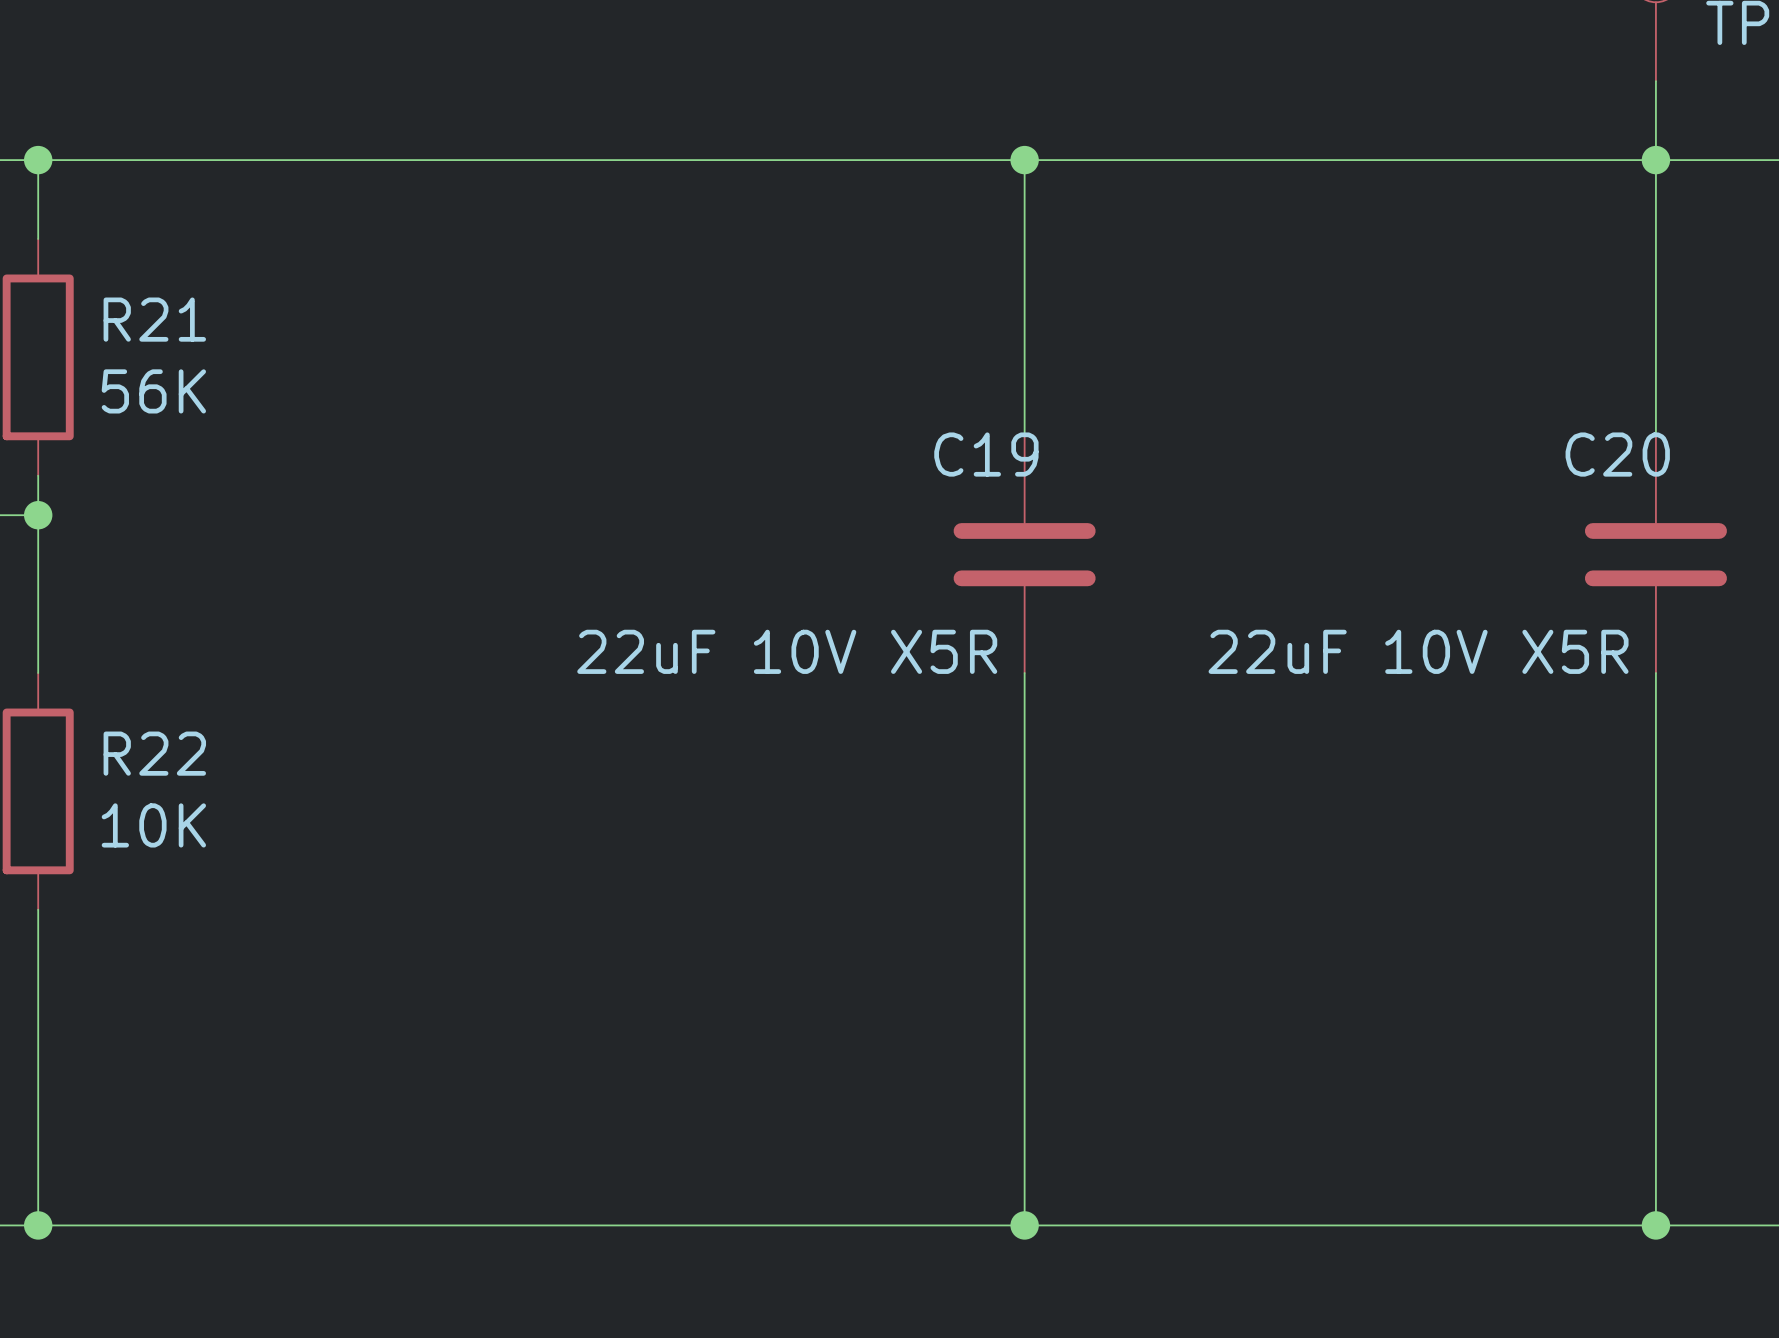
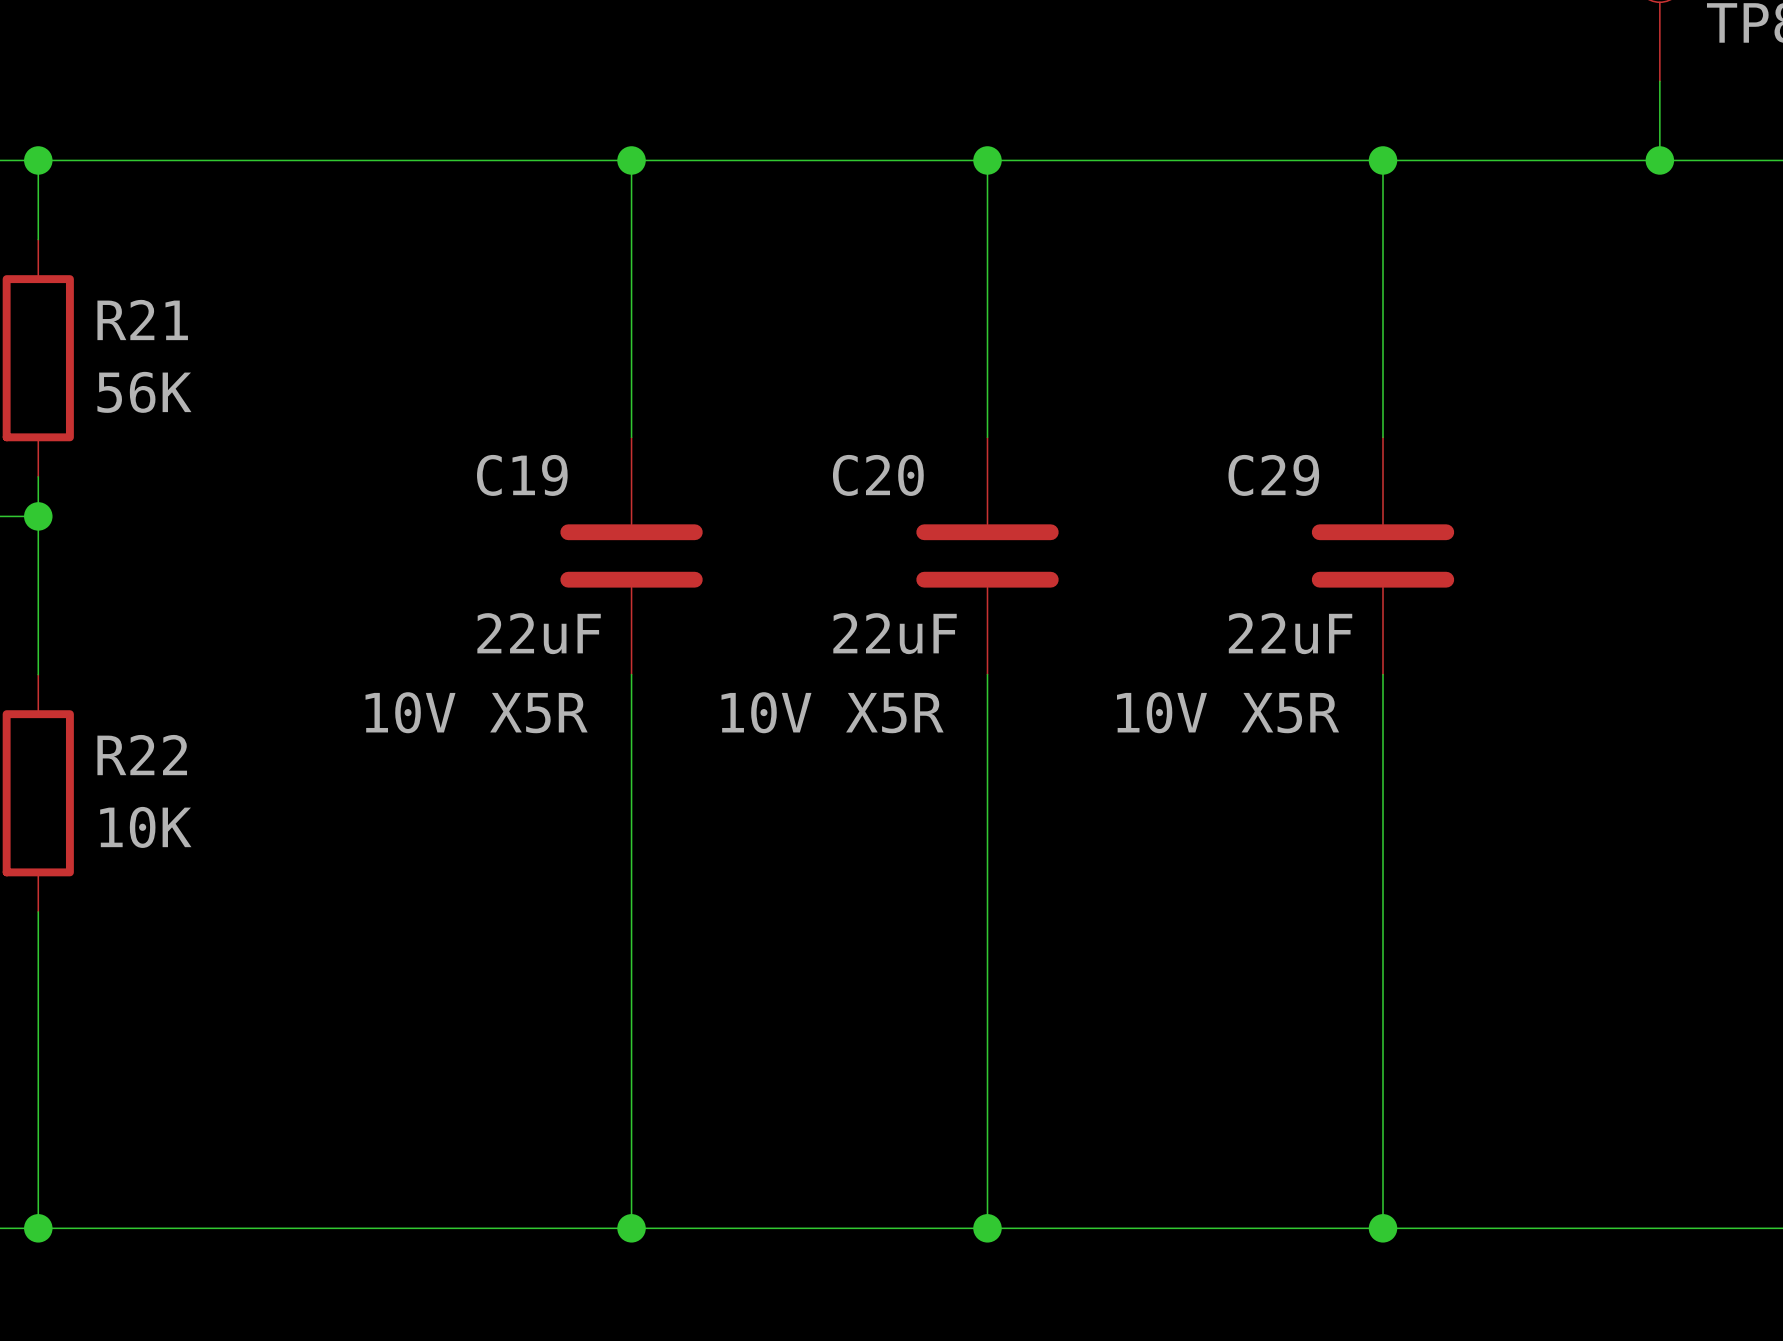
wire: none -> (631, 160) (631, 437)
junction: none -> (631, 160)
wire: (1024, 160) (1024, 436) -> (987, 160) (987, 437)
junction position: (1024, 160) -> (987, 160)
junction: none -> (1383, 160)
wire: (1655, 160) (1655, 436) -> (1383, 160) (1383, 437)
C19 name position: C19 (986, 454) -> C19 (522, 475)
C20 name position: C20 (1617, 454) -> C20 (878, 475)
C19 position: (1024, 554) -> (631, 555)
C29: none -> 22uF (1383, 555)
C20 position: (1655, 554) -> (987, 555)
C19 value: 22uF 10V X5R (787, 651) -> 22uF (539, 633)
C20 value: 22uF 10V X5R (1418, 651) -> 22uF (895, 633)
wire: none -> (631, 674) (631, 1228)
wire: (1024, 673) (1024, 1225) -> (987, 674) (987, 1228)
wire: (1655, 673) (1655, 1225) -> (1383, 674) (1383, 1228)
C19 text: none -> 10V X5R (476, 712)
C20 text: none -> 10V X5R (832, 712)
junction: none -> (631, 1228)
junction position: (1024, 1225) -> (987, 1228)
junction: none -> (1383, 1228)
junction: (1655, 1225) -> none

